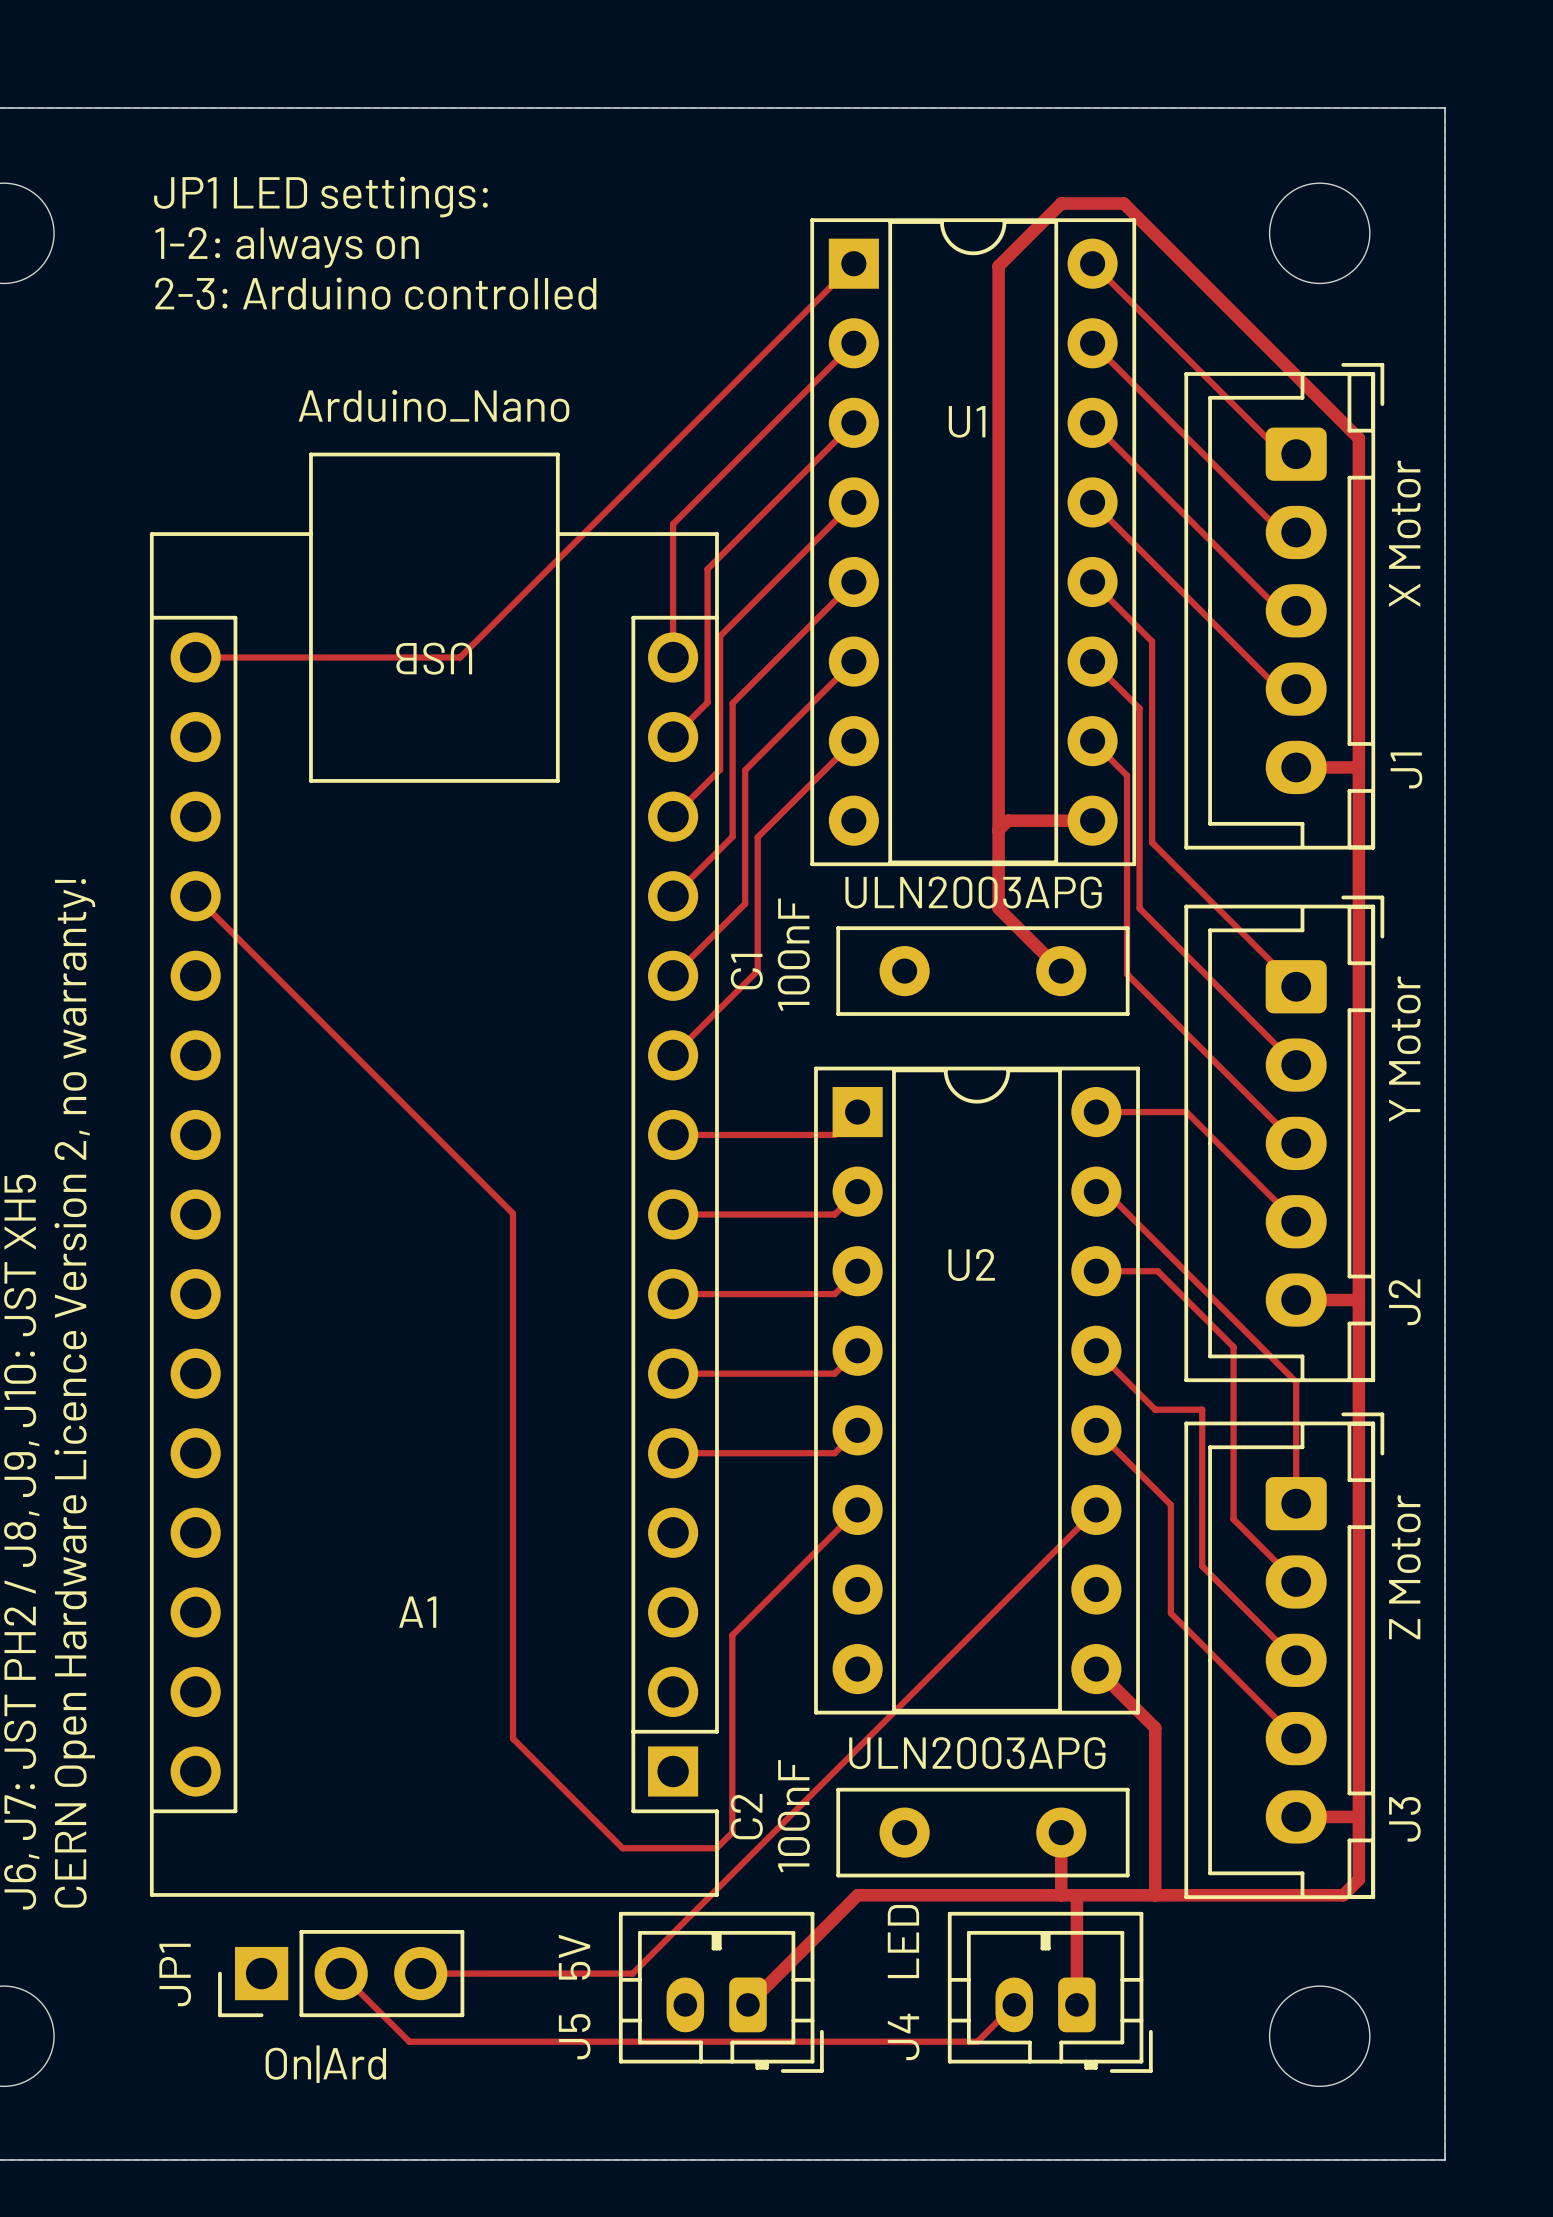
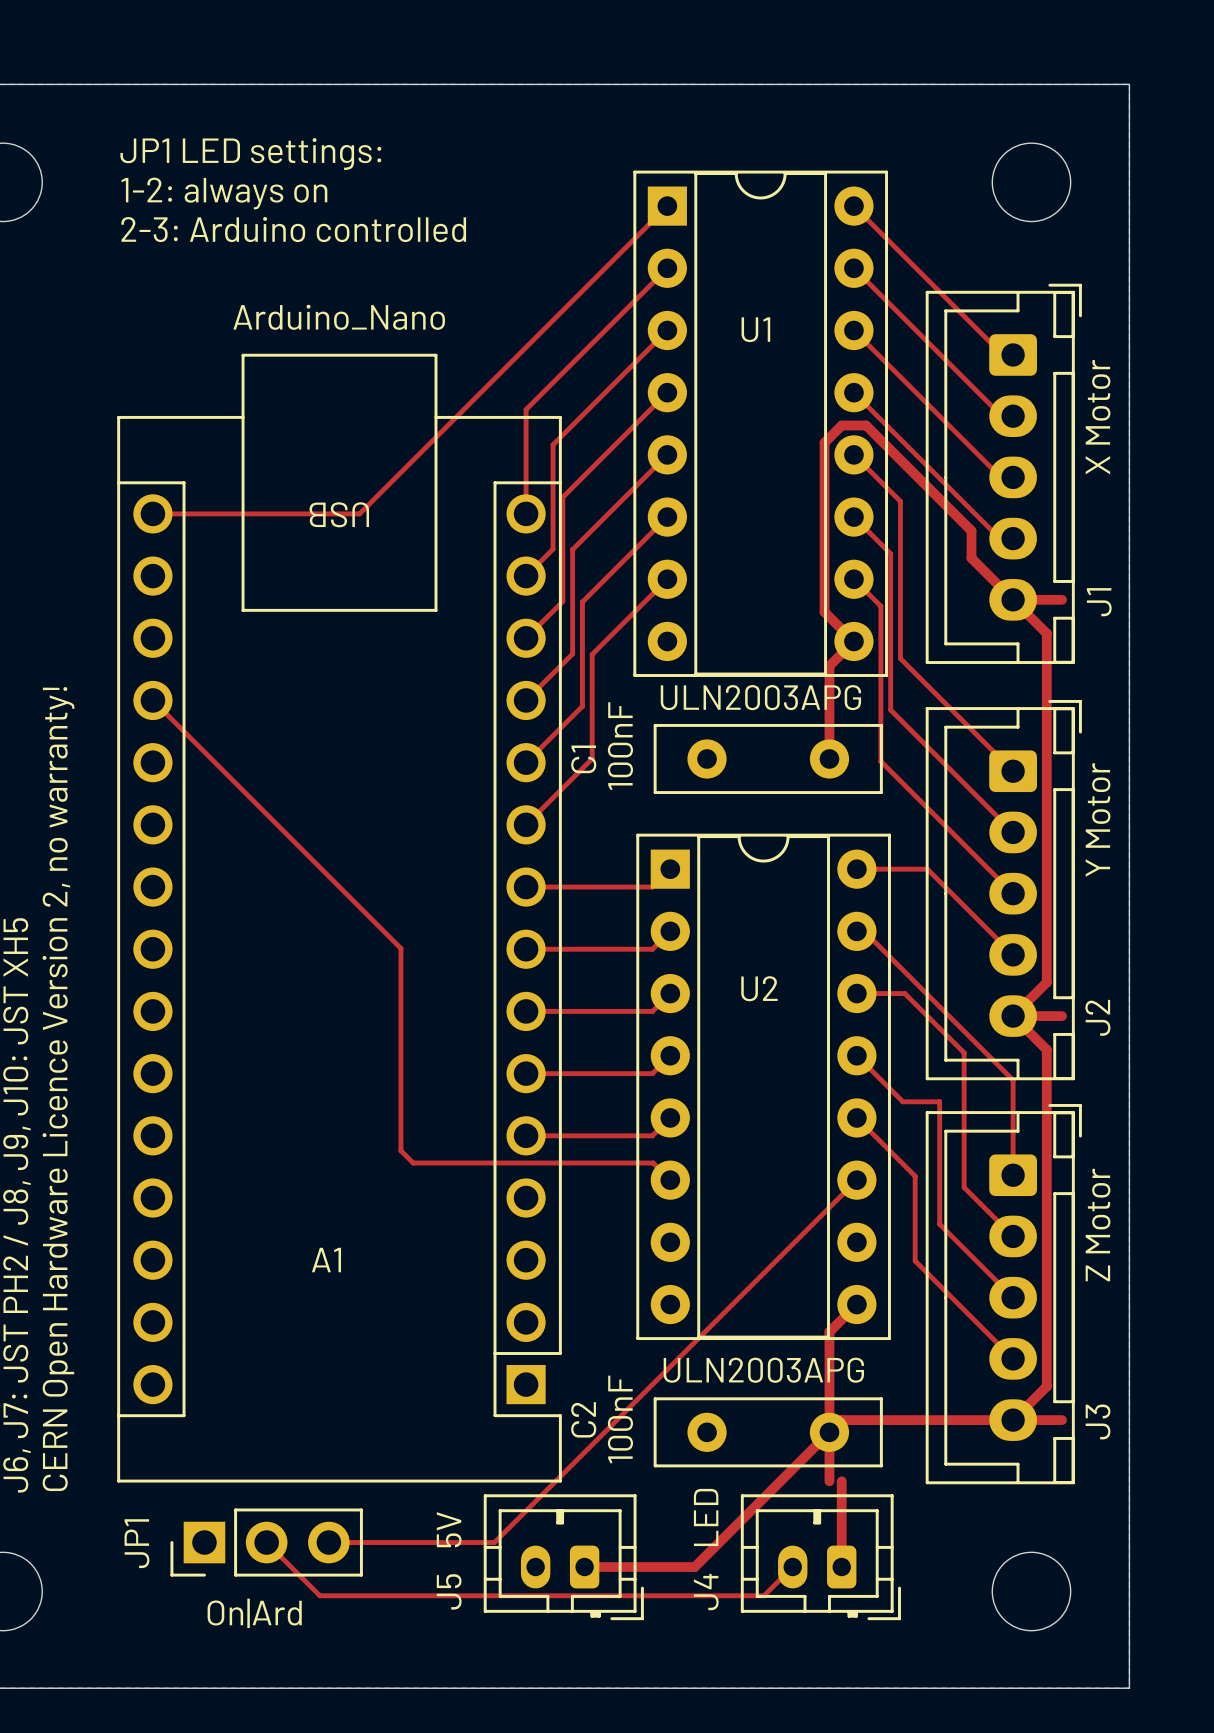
top track: (1092, 820) (1008, 820) (998, 830) -> none
top track: (1061, 971) (998, 908) (998, 266) (1061, 203) (1123, 203) (1358, 438) (1358, 1879) (1343, 1895) (857, 1895) (747, 2004) -> (829, 758) (829, 665) (853, 641) (824, 612) (824, 442) (841, 425) (866, 425) (971, 530) (971, 558) (1046, 633) (1046, 982) (1013, 1016) (1046, 1049) (1046, 1386) (1013, 1420) (841, 1420) (694, 1567) (584, 1567)
top track: (513, 1472) (513, 1738) (622, 1848) (716, 1848) (732, 1832) (732, 1635) (857, 1509) -> (400, 1150) (413, 1163) (653, 1163) (670, 1180)
top track: (1096, 1669) (1155, 1727) (1155, 1895) -> (856, 1304) (829, 1331) (829, 1432)

